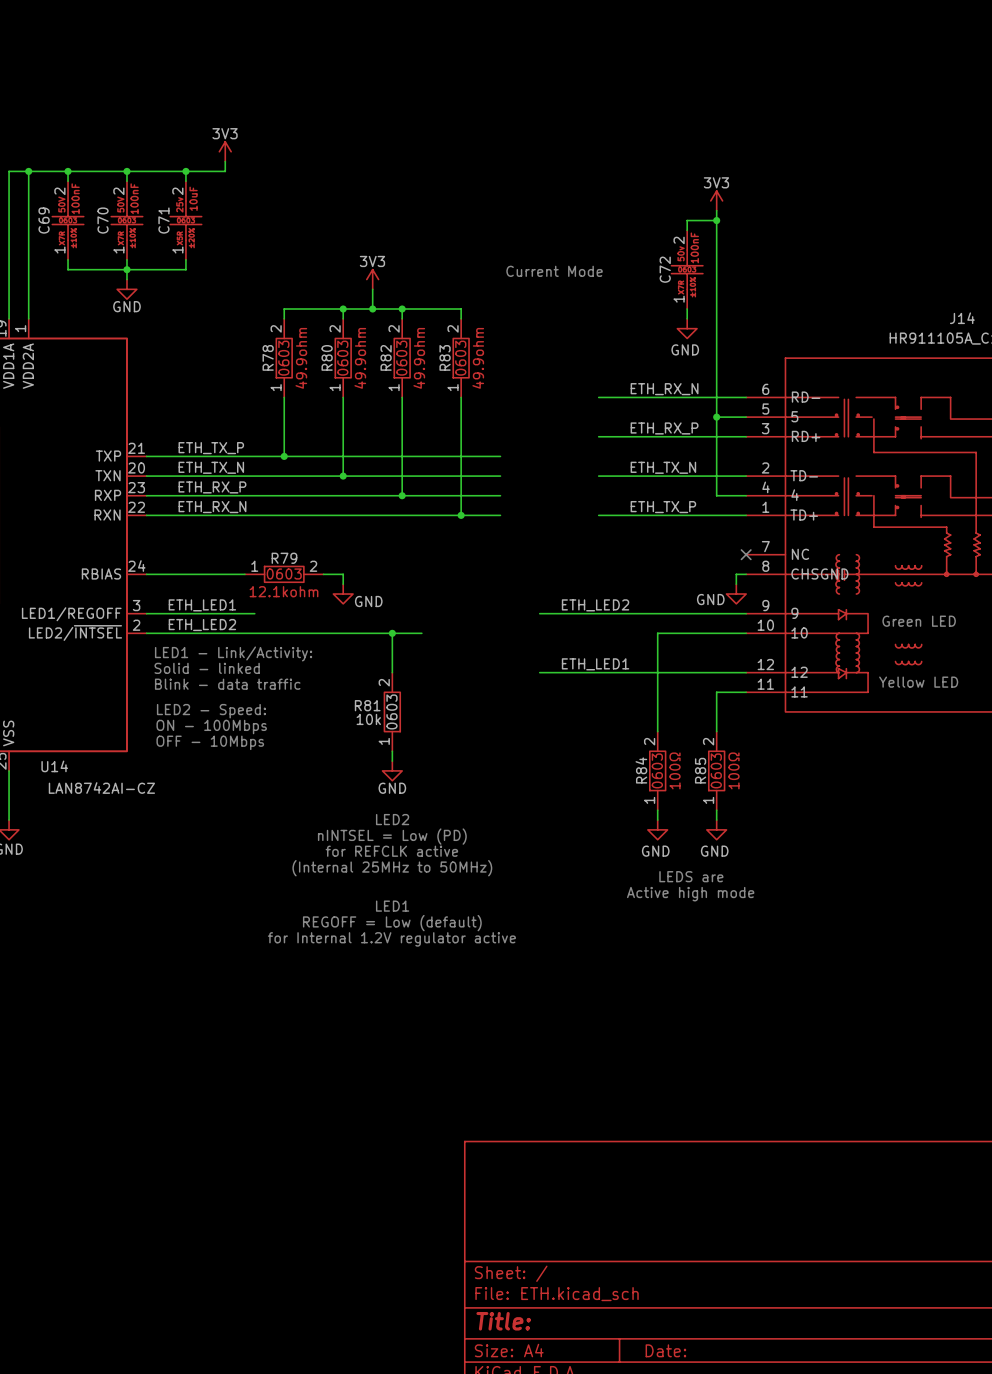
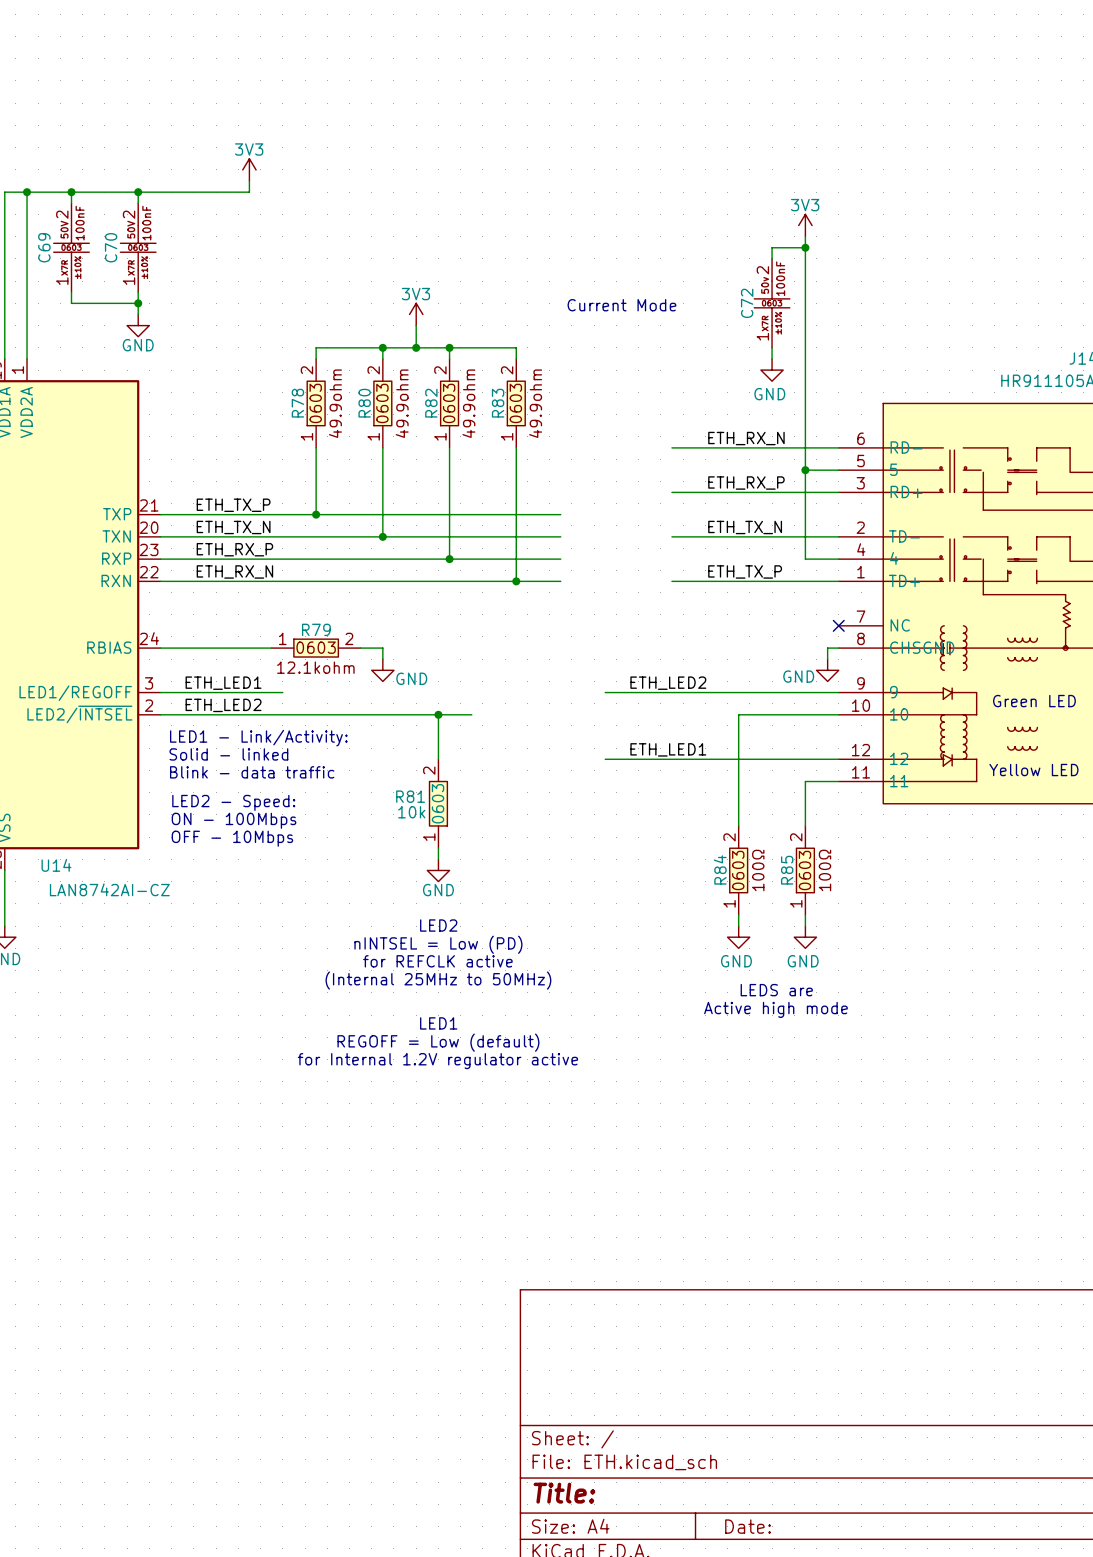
wire: (185, 171) (185, 181) -> none
junction: (185, 171) -> none
C71: (185, 220) -> none
wire: (185, 259) (185, 269) (126, 269) -> none

